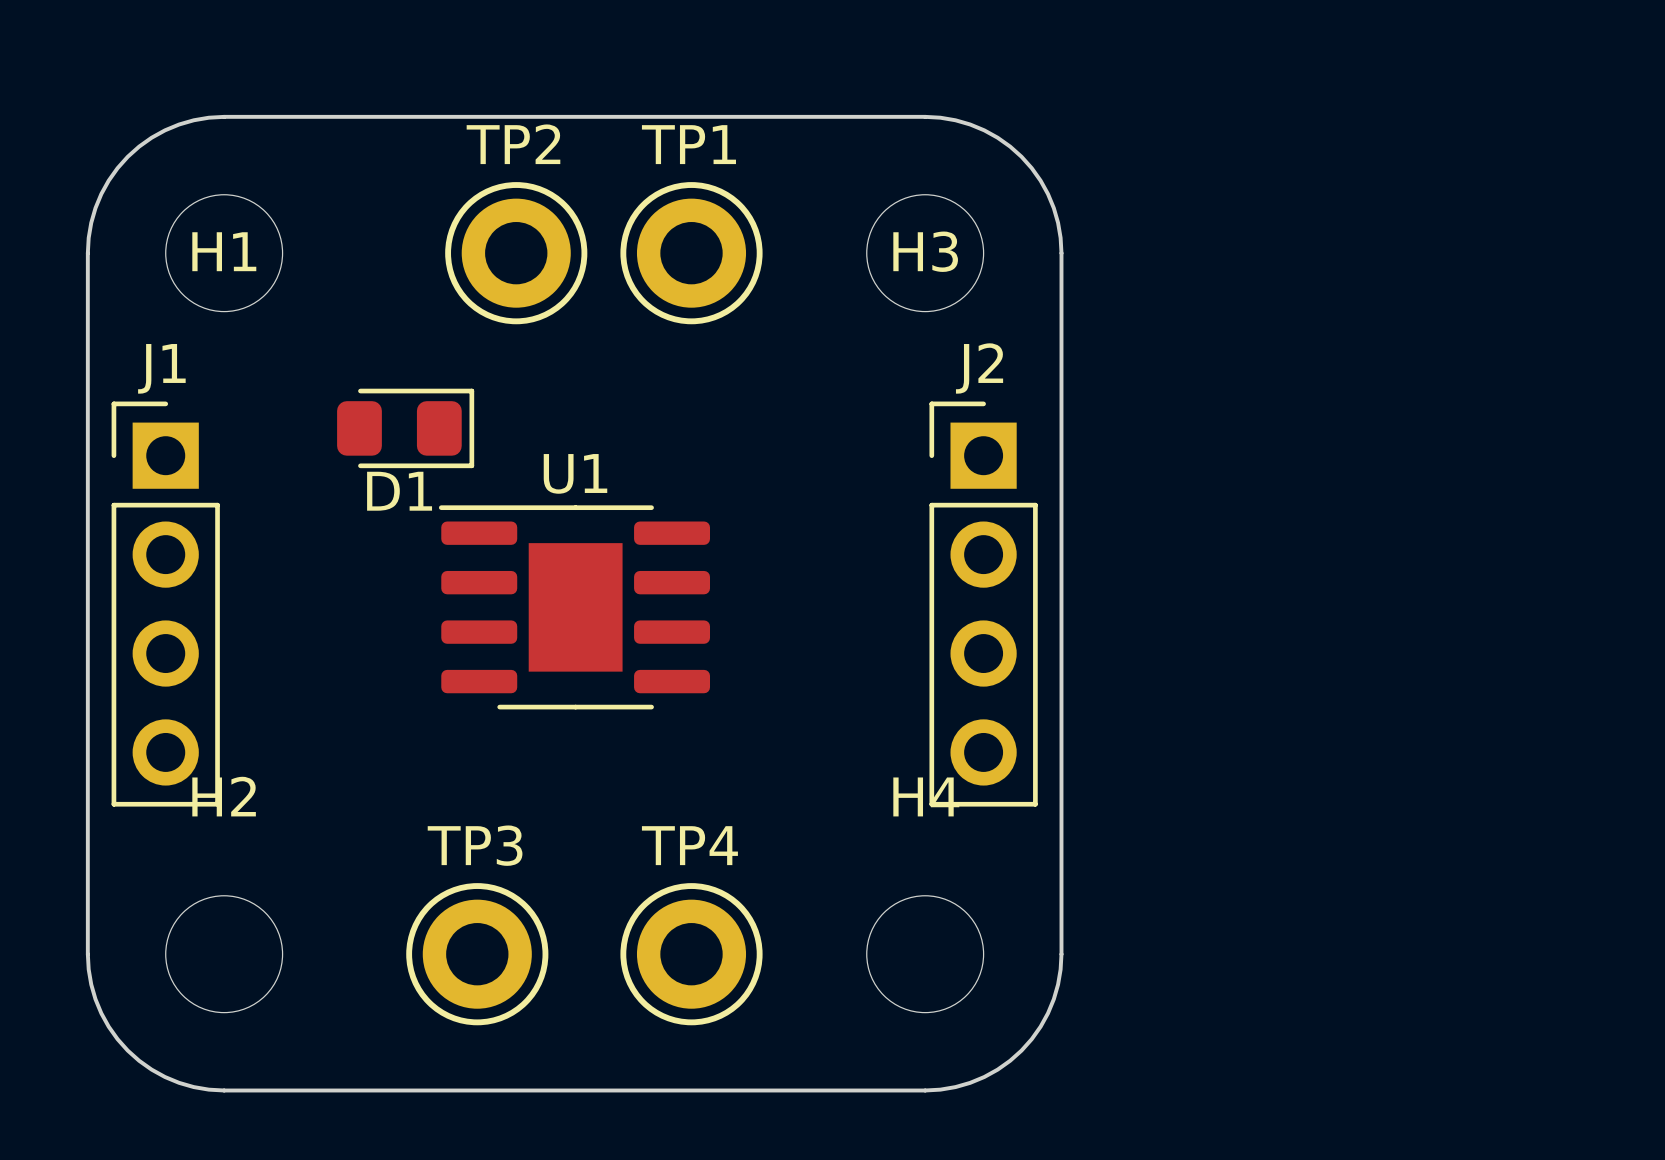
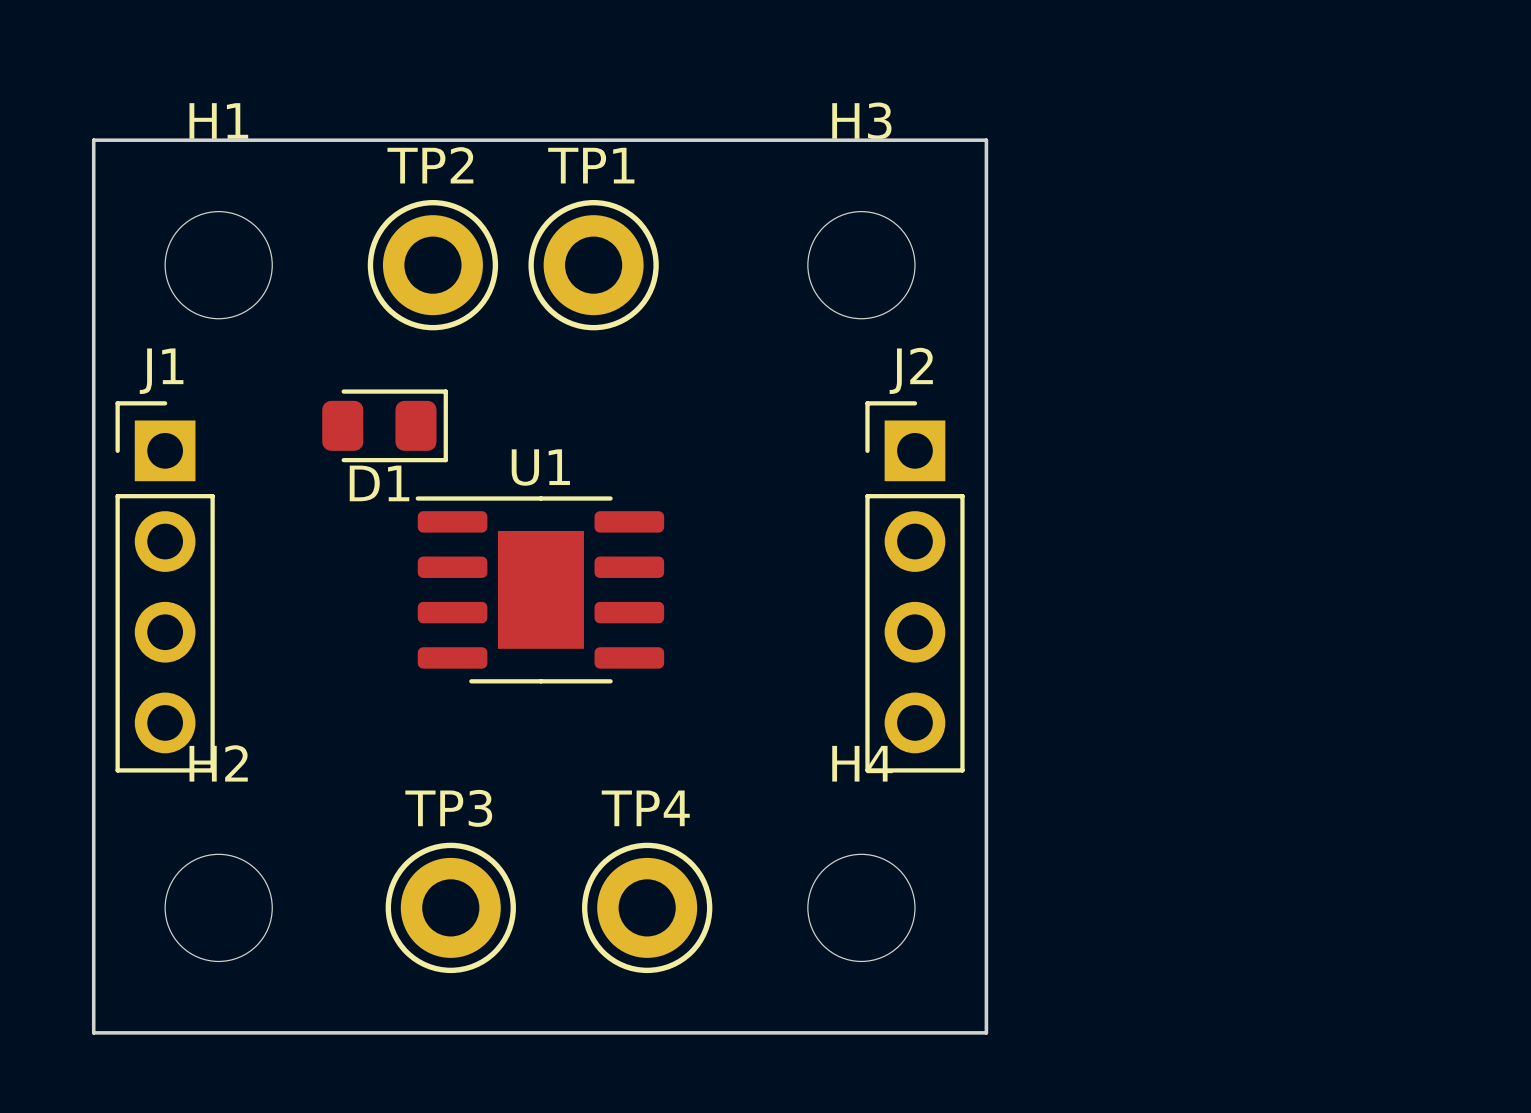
board edge: (224, 116) (193, 120) (165, 130) (151, 137) (127, 156) (108, 180) (95, 208) (88, 237) (87, 253) -> (218, 140) (93, 140) (93, 265)
board edge: (925, 116) (955, 120) (984, 130) (1010, 146) (1021, 156) (1040, 180) (1053, 208) (1060, 237) (1061, 253) -> (861, 140) (986, 140) (986, 265)
H1 name position: H1 (224, 251) -> H1 (218, 121)
H3 name position: H3 (925, 251) -> H3 (861, 121)
TP2 position: (516, 253) -> (432, 265)
TP1 position: (691, 253) -> (593, 265)
board edge: (87, 954) (88, 969) (95, 999) (108, 1026) (127, 1050) (139, 1060) (165, 1077) (193, 1087) (224, 1090) -> (93, 907) (93, 1032) (218, 1032)
board edge: (1061, 954) (1058, 984) (1047, 1013) (1031, 1039) (1021, 1050) (997, 1069) (970, 1082) (940, 1089) (925, 1090) -> (986, 907) (986, 1032) (861, 1032)

